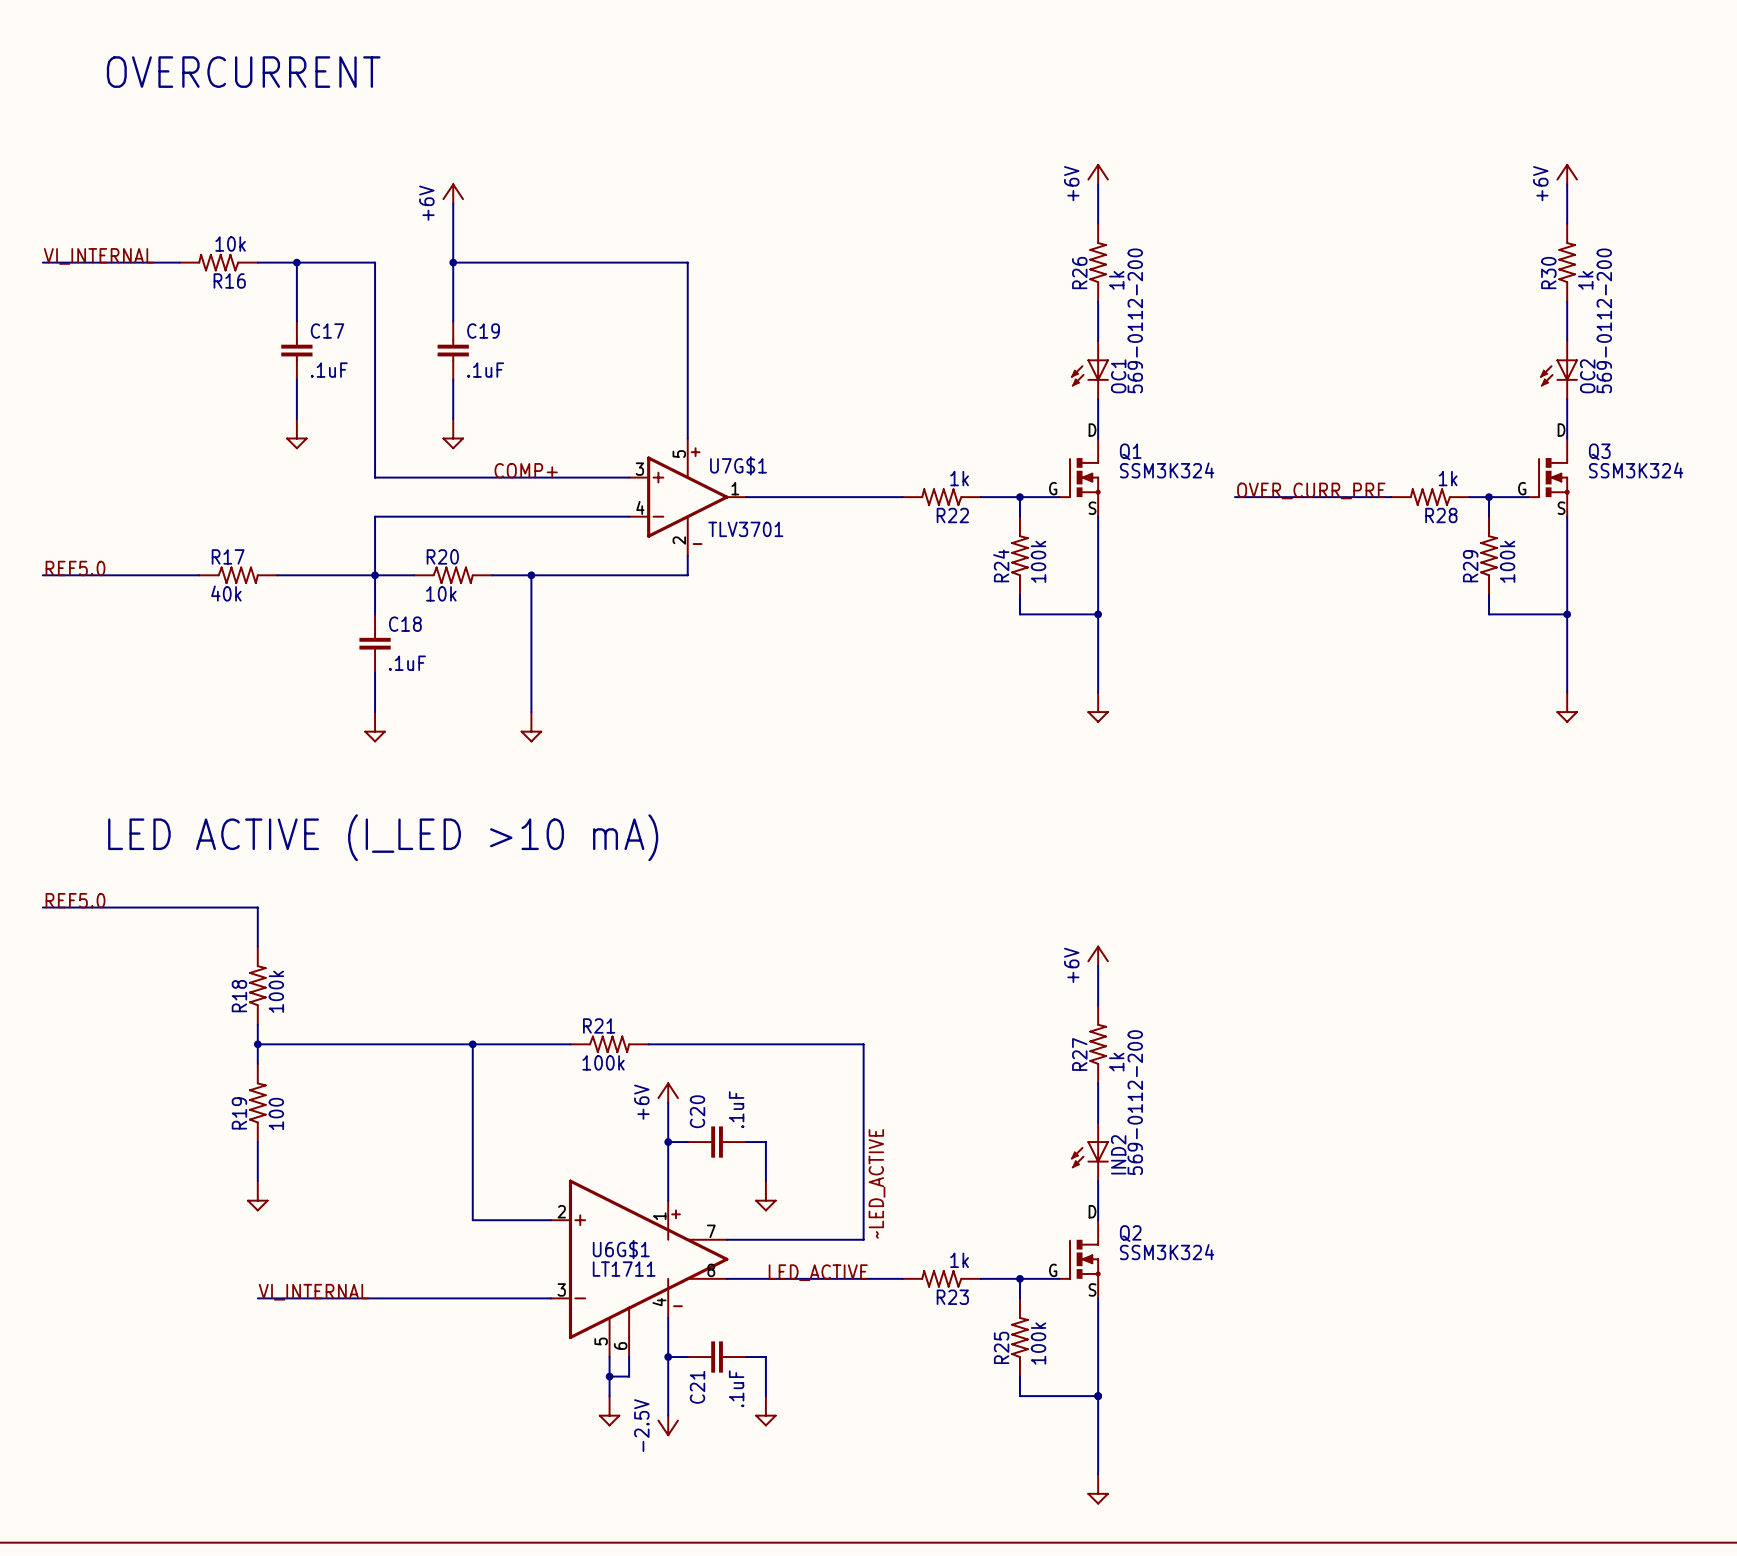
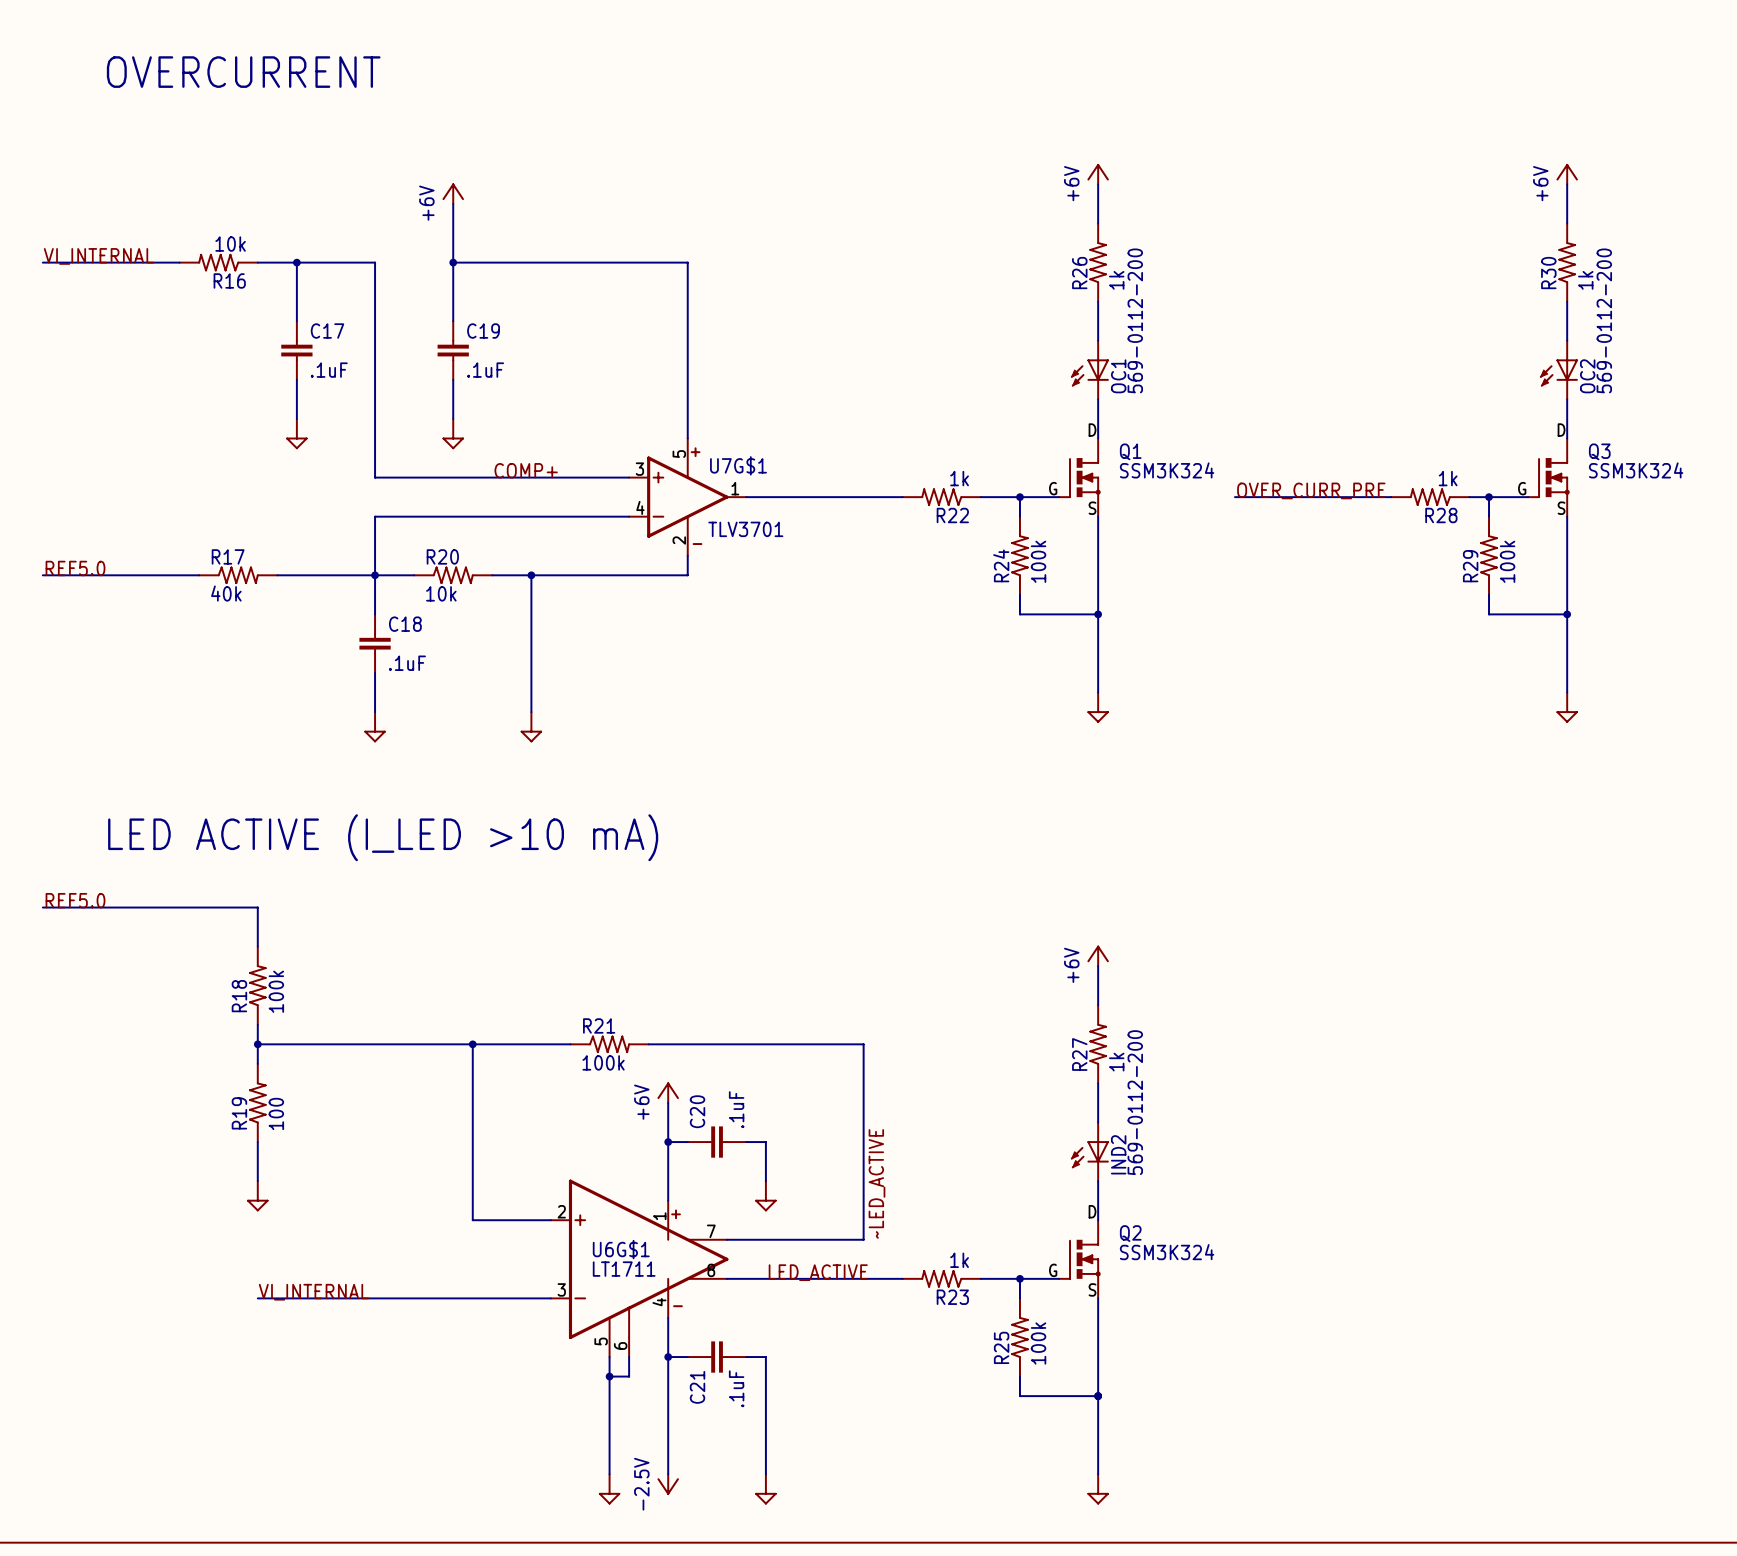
wire: none -> (609, 1396) (609, 1474)
wire: none -> (765, 1396) (765, 1474)
part position: (609, 1410) -> (609, 1488)
part position: (765, 1410) -> (765, 1488)
wire: none -> (668, 1415) (668, 1474)
part position: (668, 1425) -> (668, 1484)

